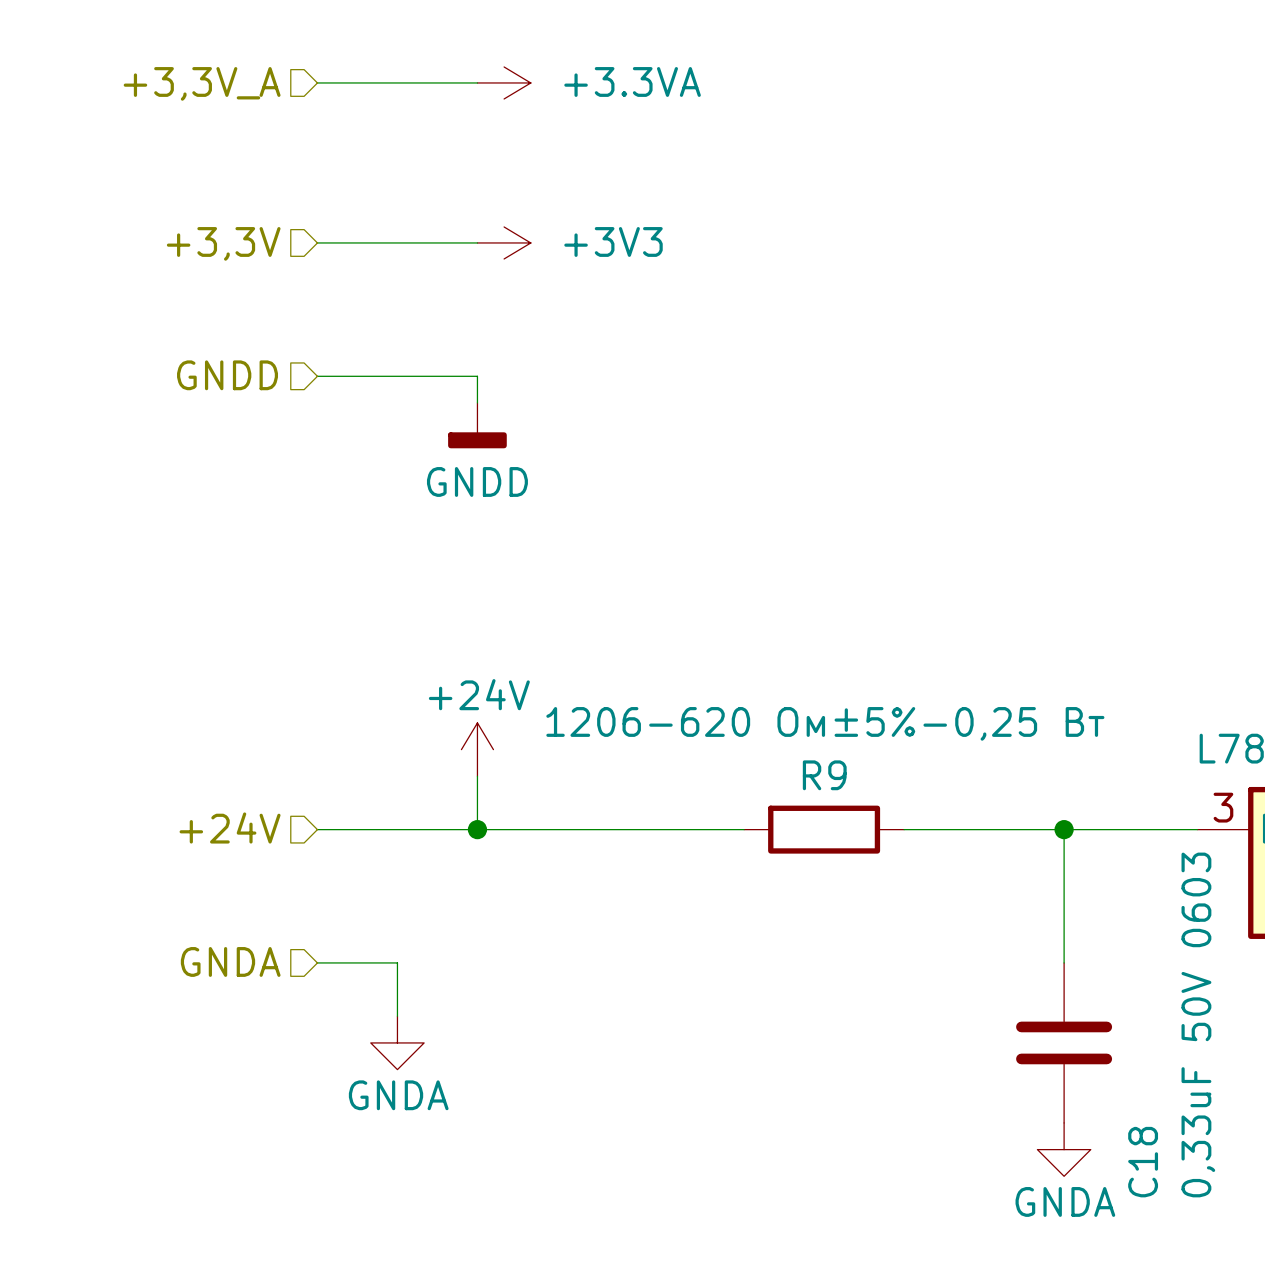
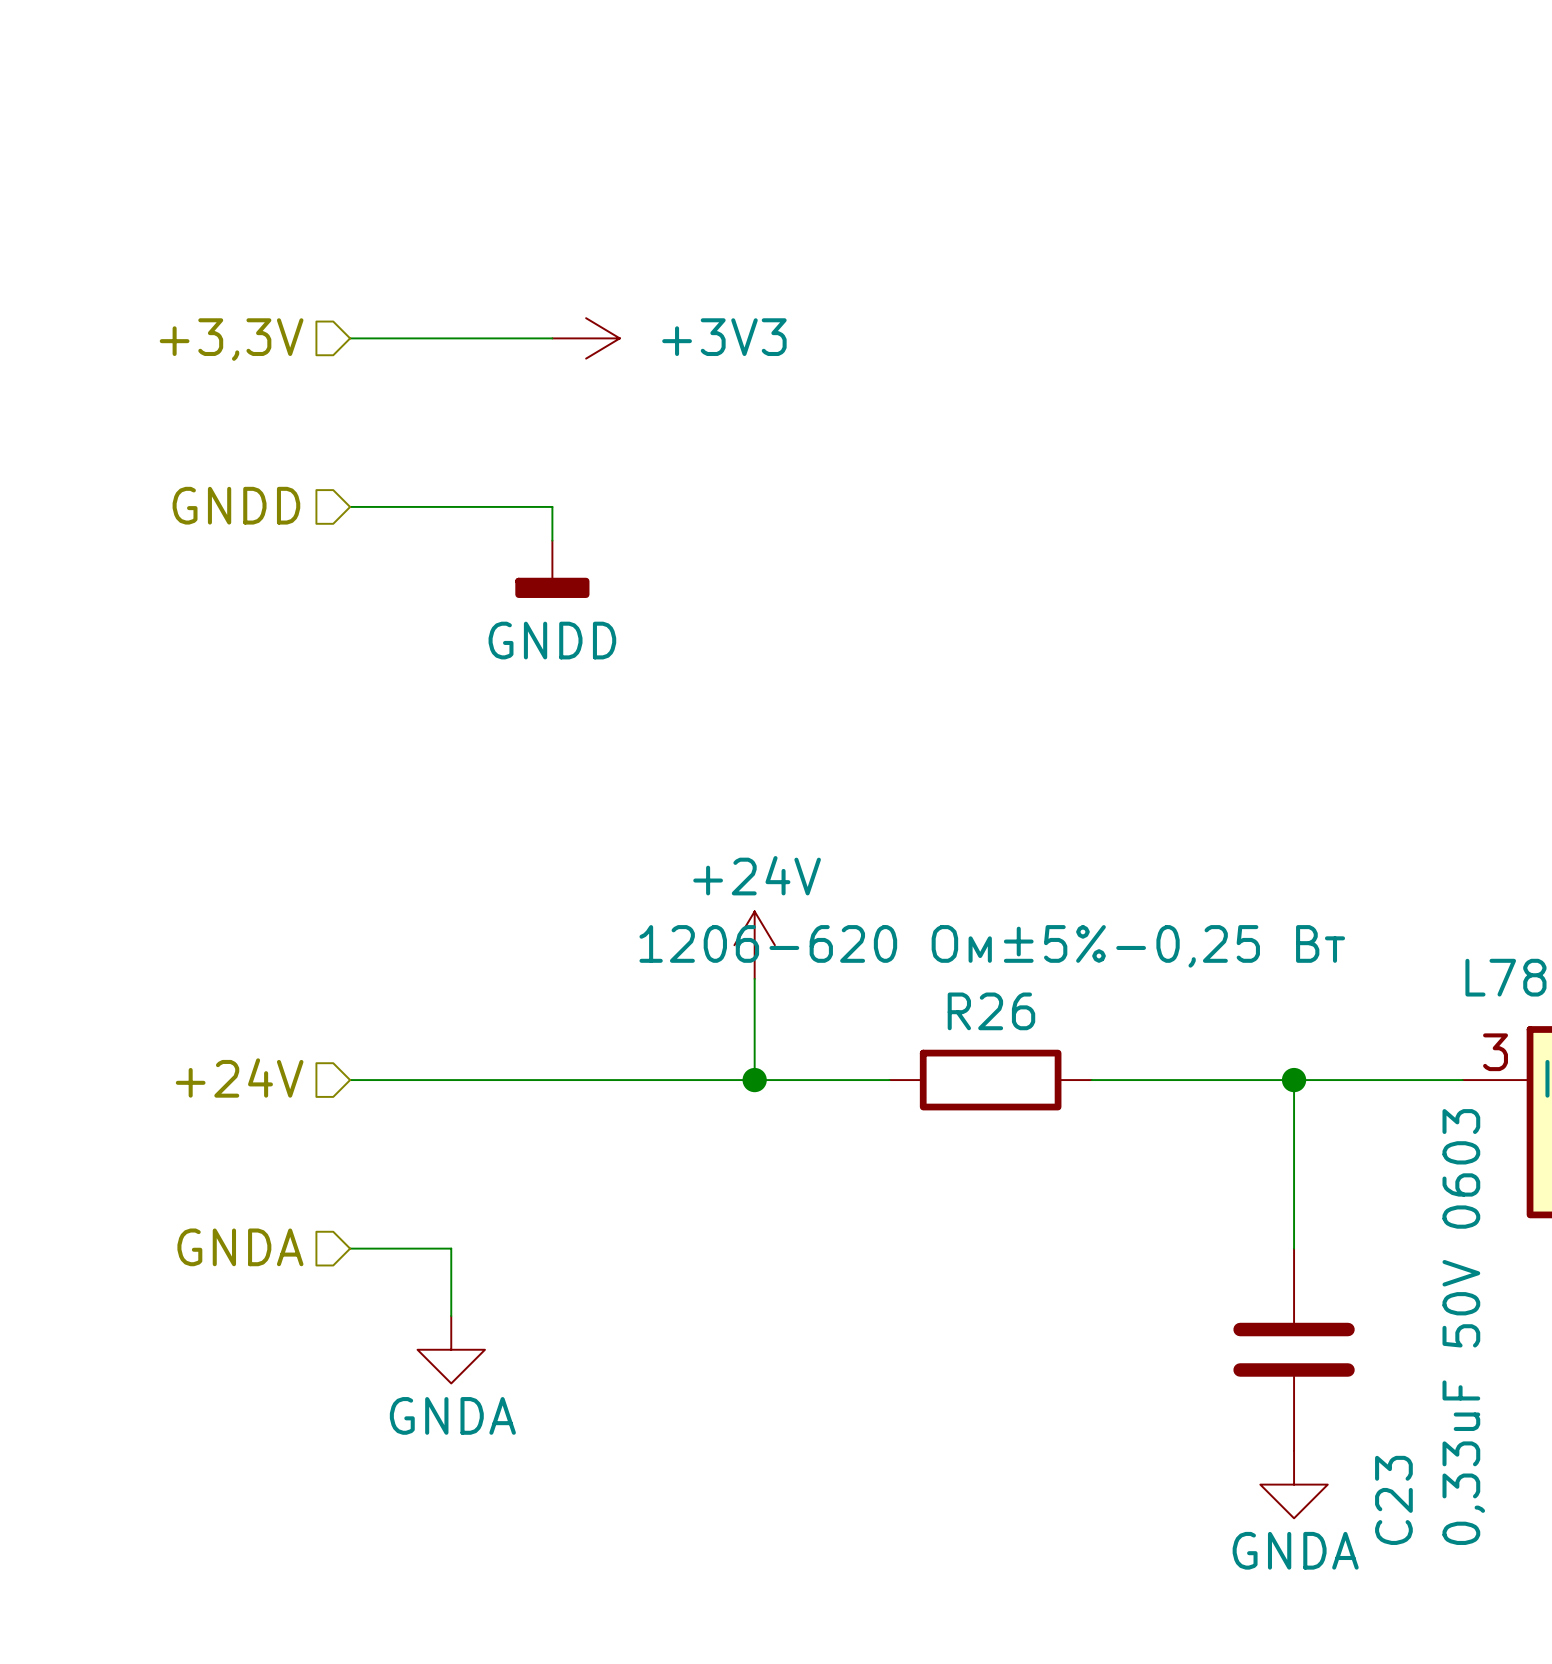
wire: (317, 82) (477, 82) -> none
power symbol: +3.3VA (504, 82) -> none
hierarchical label: +3,3V_A (202, 83) -> none
power symbol position: +24V (477, 749) -> +24V (754, 945)
wire: none -> (754, 978) (754, 1080)
R9 name: R9 (824, 775) -> R26 (991, 1011)
wire: (477, 776) (477, 829) -> none
junction: (477, 829) -> none
junction: none -> (754, 1080)
C18 name: C18 (1143, 1162) -> C23 (1393, 1500)

